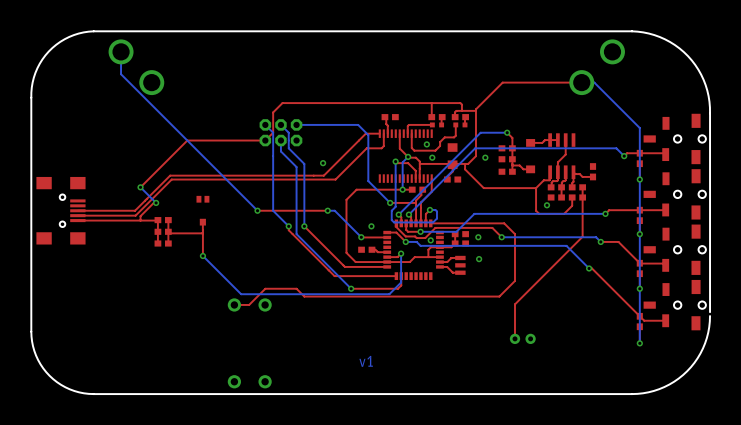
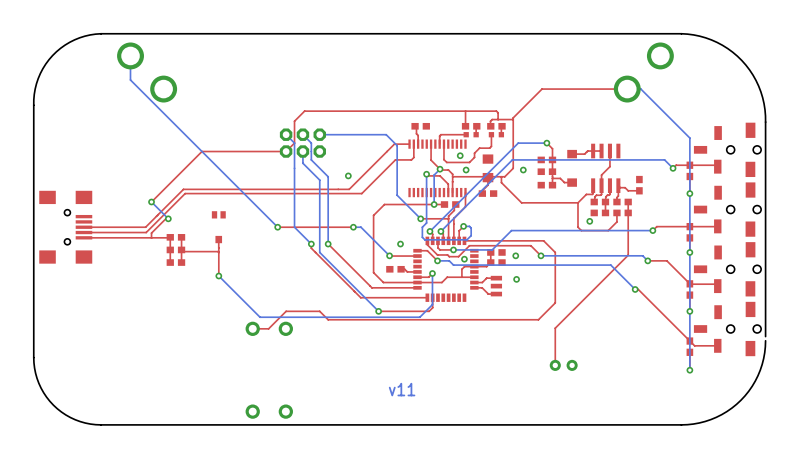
text: v1 (366, 361) -> v11 (402, 389)

